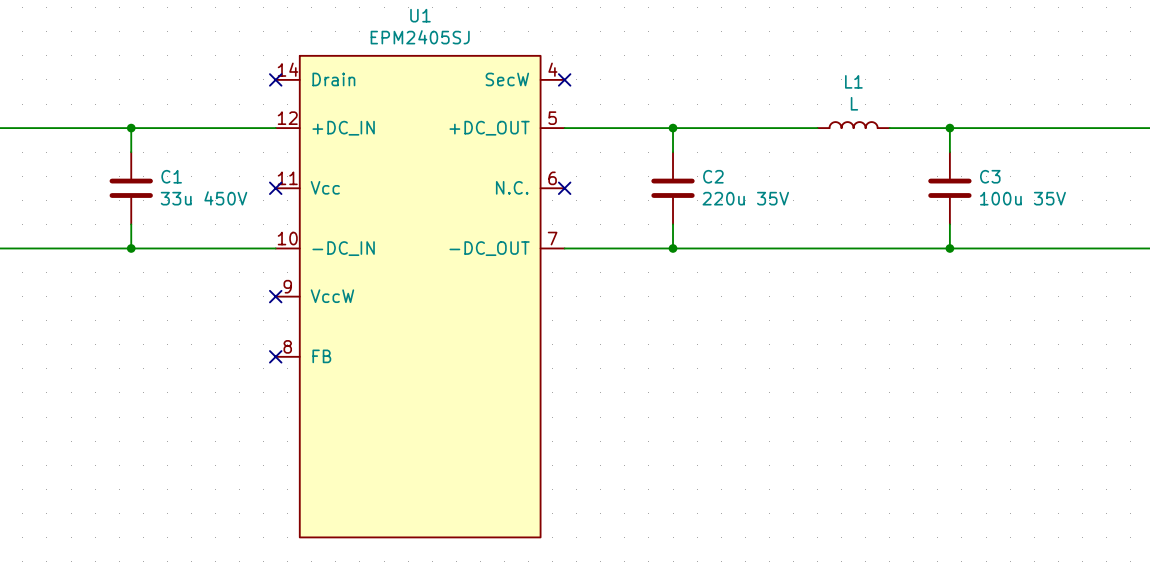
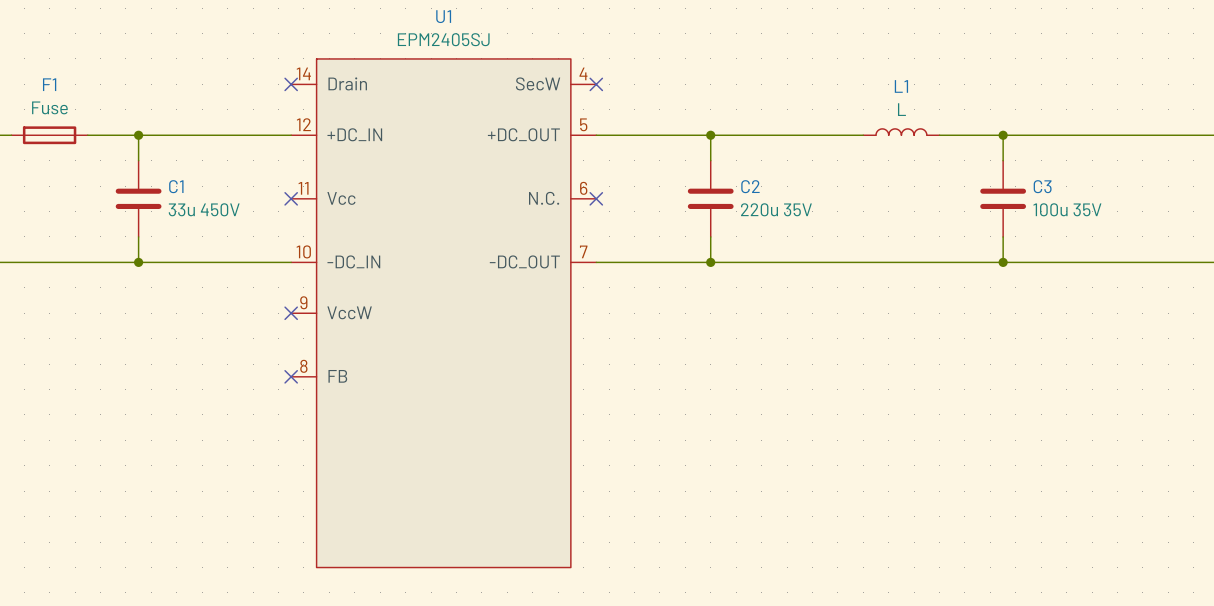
F1: none -> Fuse (49, 135)

